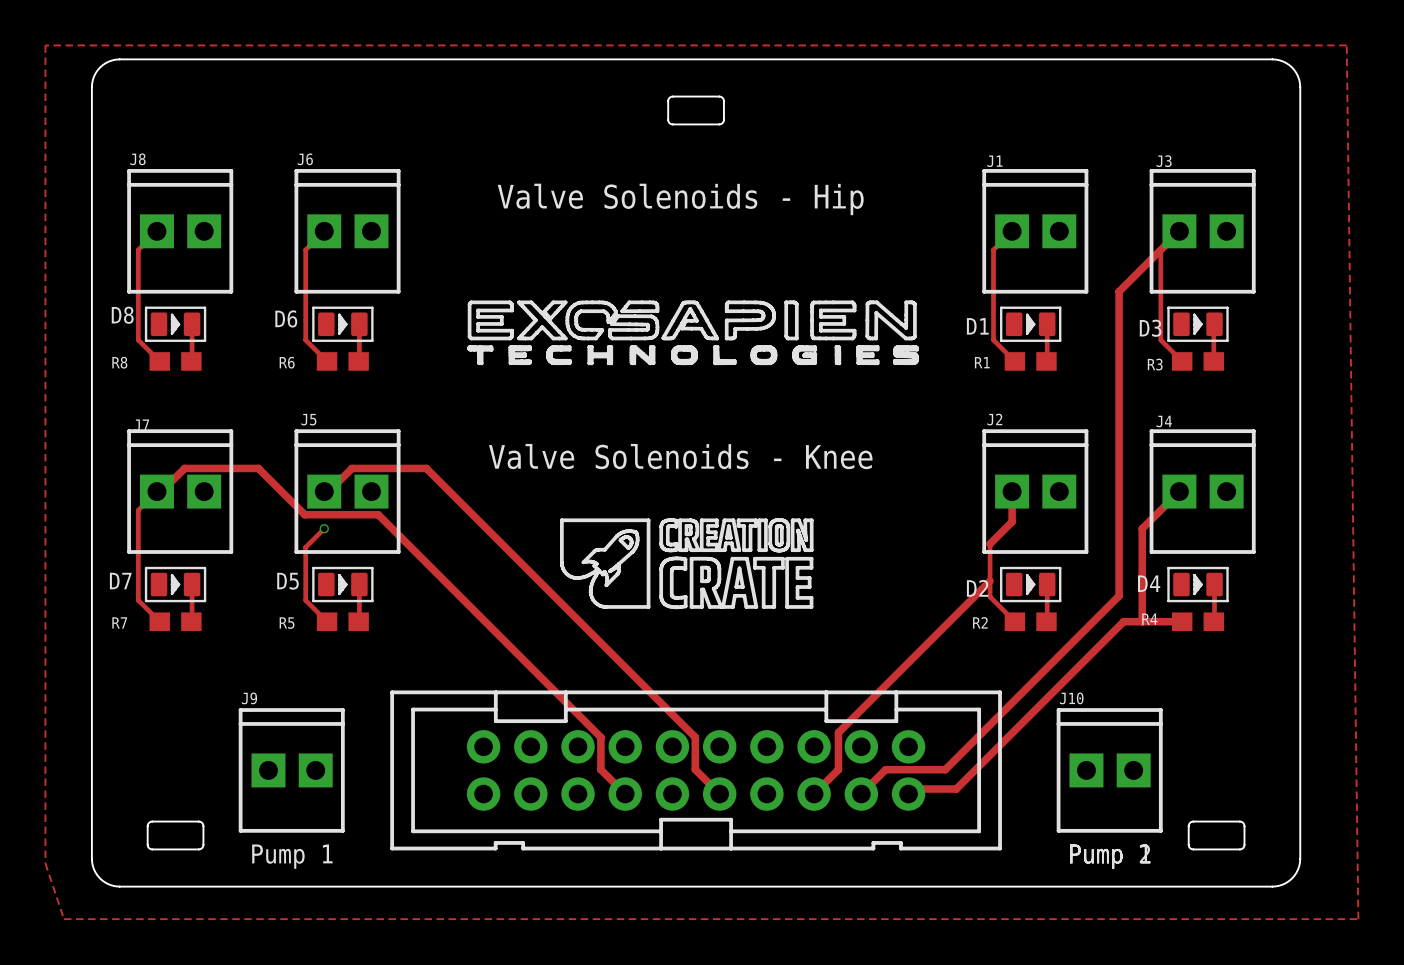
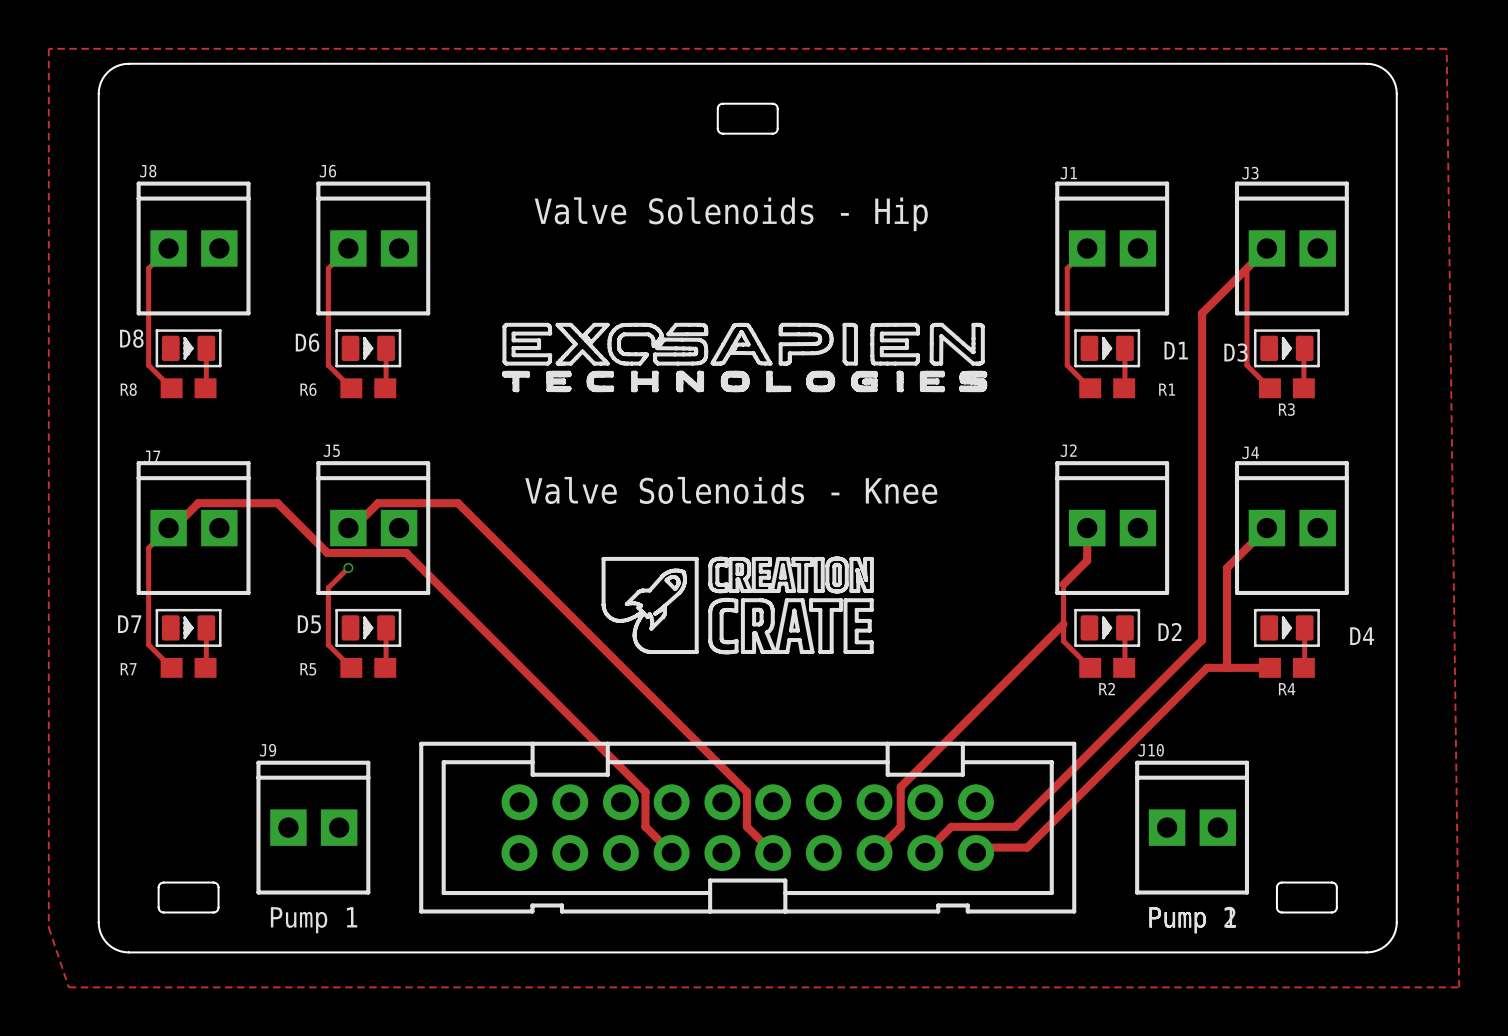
D1 name position: D1 (977, 326) -> D1 (1176, 350)
R1 name position: R1 (982, 362) -> R1 (1167, 389)
R3 name position: R3 (1155, 364) -> R3 (1286, 409)
D4 name position: D4 (1149, 583) -> D4 (1362, 636)
D2 name position: D2 (977, 588) -> D2 (1170, 632)
R4 name position: R4 (1149, 619) -> R4 (1287, 689)
R2 name position: R2 (980, 622) -> R2 (1107, 689)

